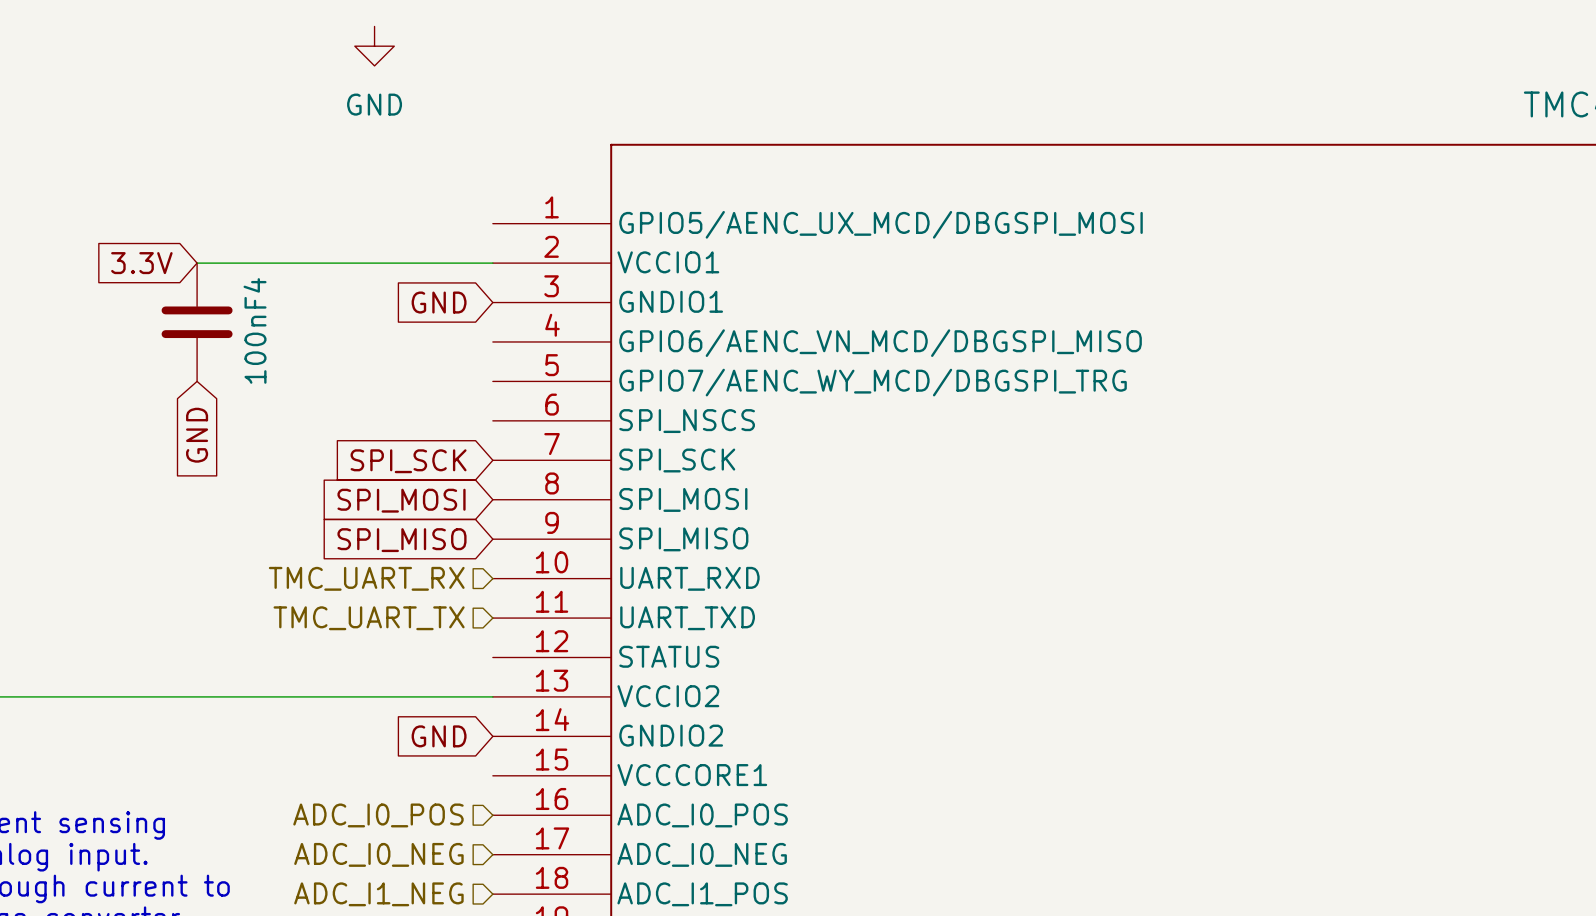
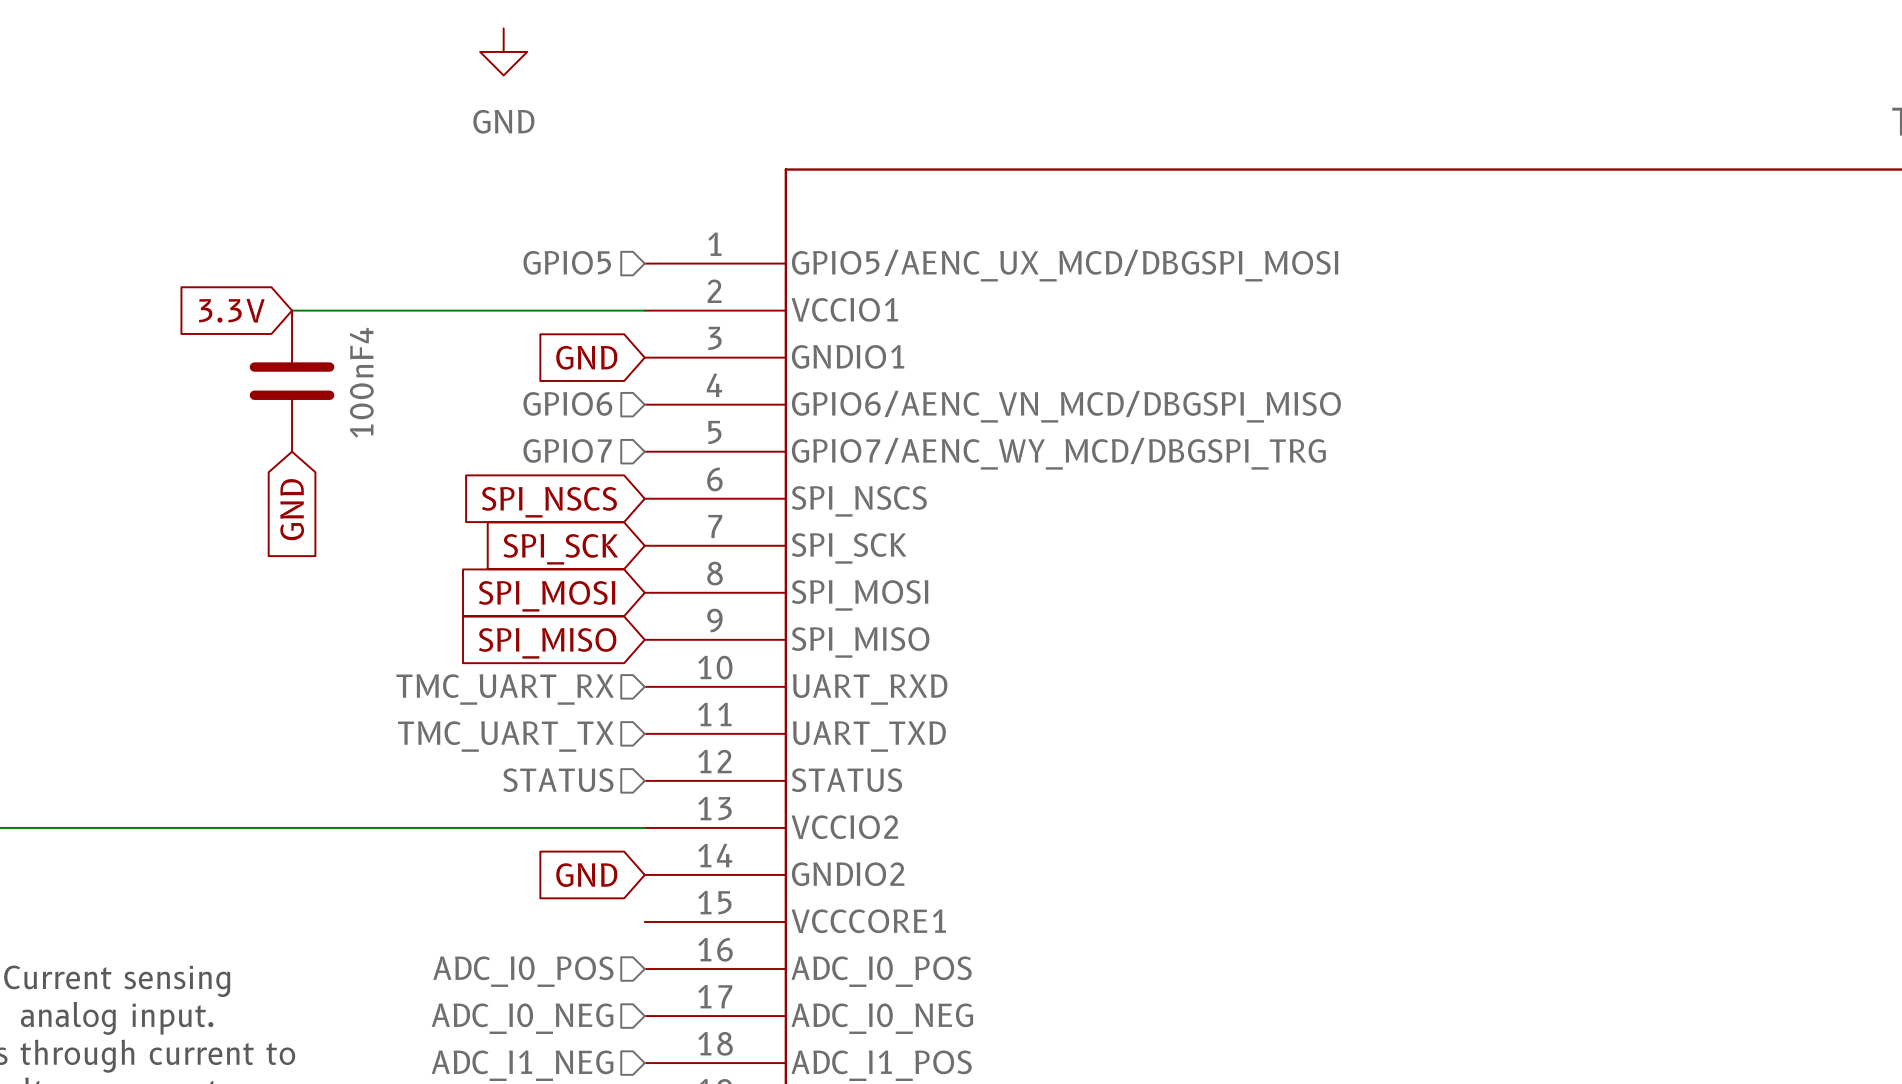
hierarchical label: none -> GPIO5 (567, 262)
hierarchical label: none -> GPIO6 (567, 403)
hierarchical label: none -> GPIO7 (567, 450)
global label: none -> SPI_NSCS (549, 502)
hierarchical label: none -> STATUS (558, 780)

